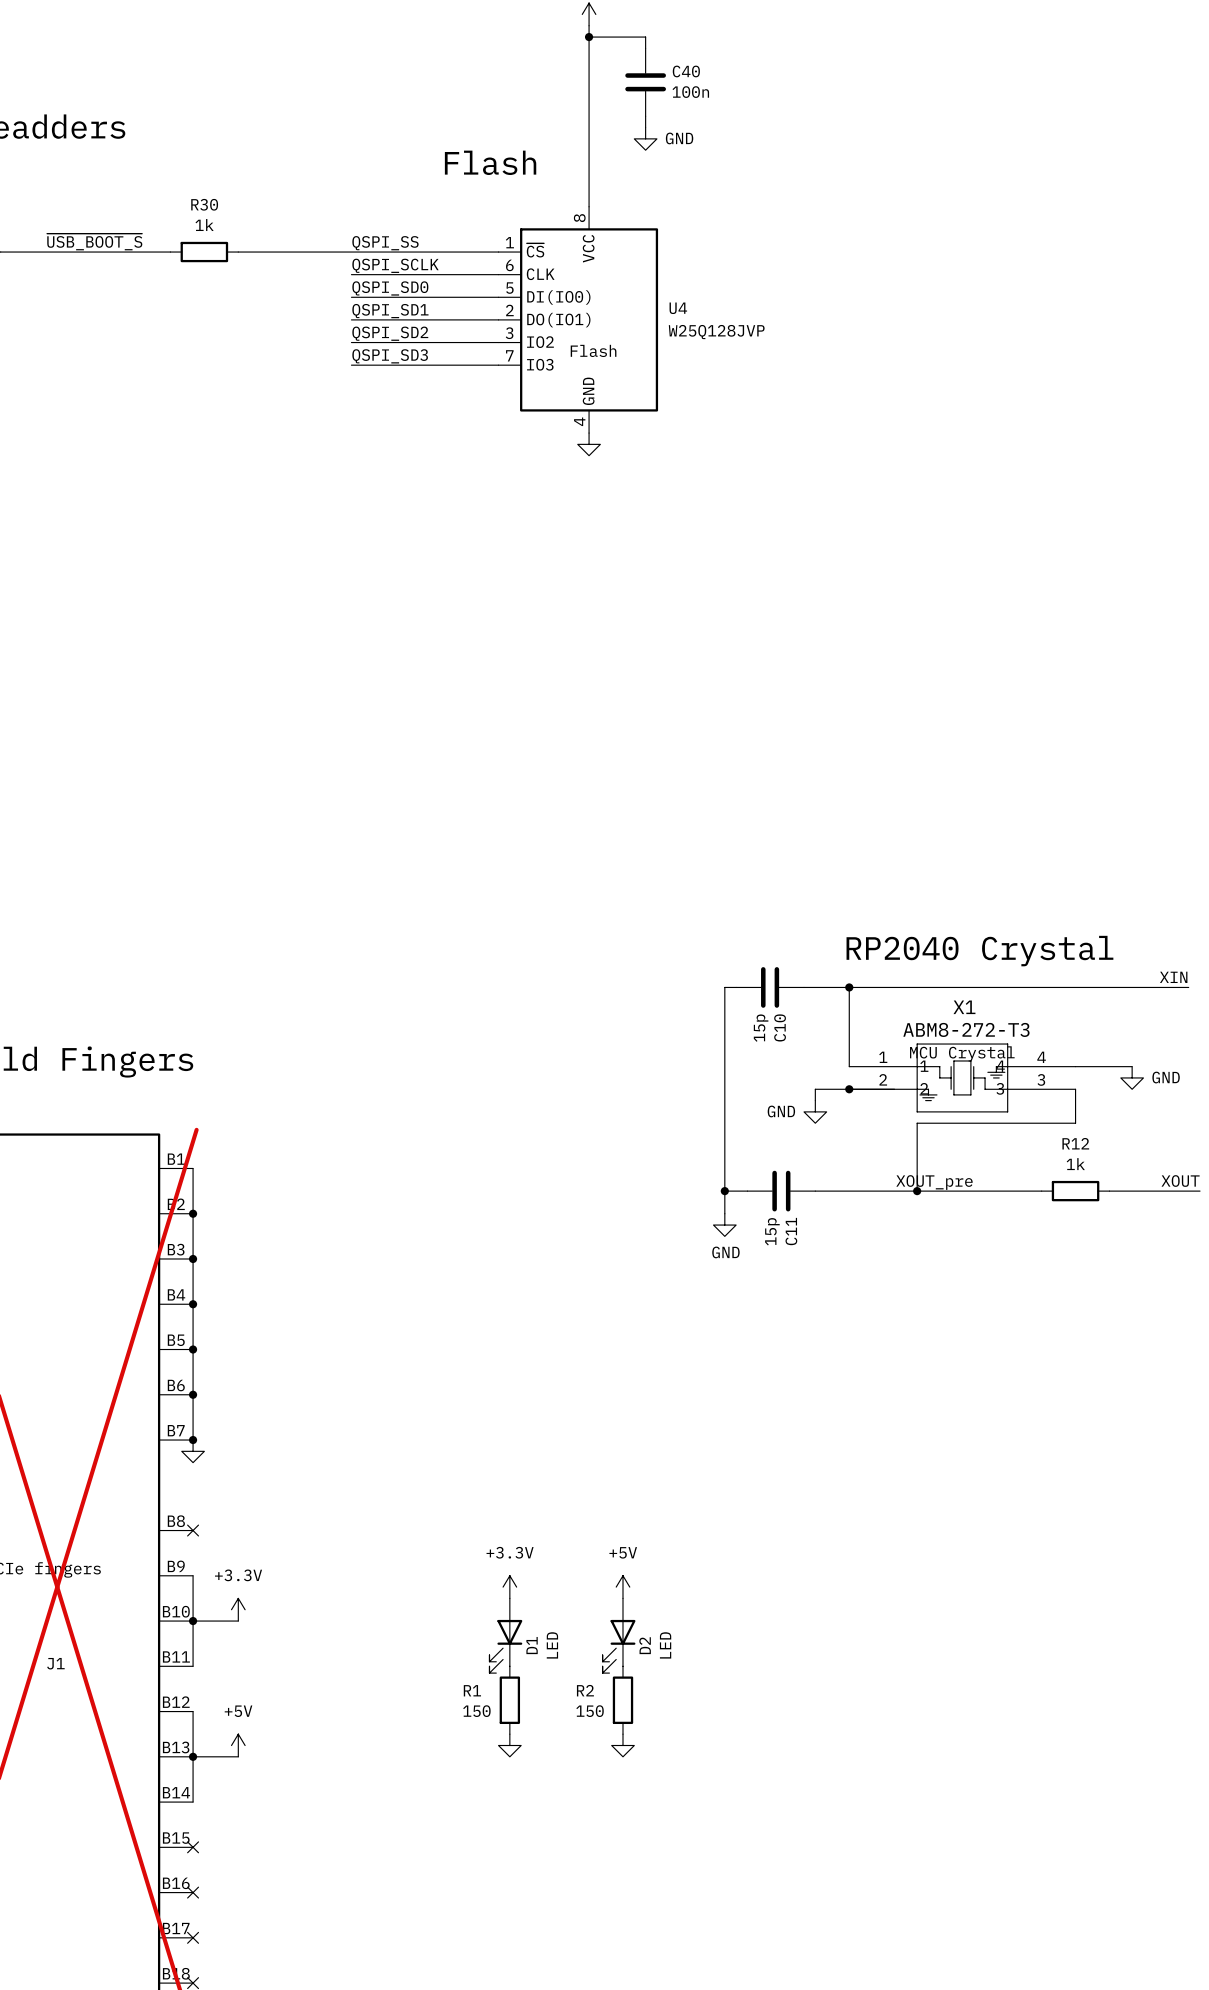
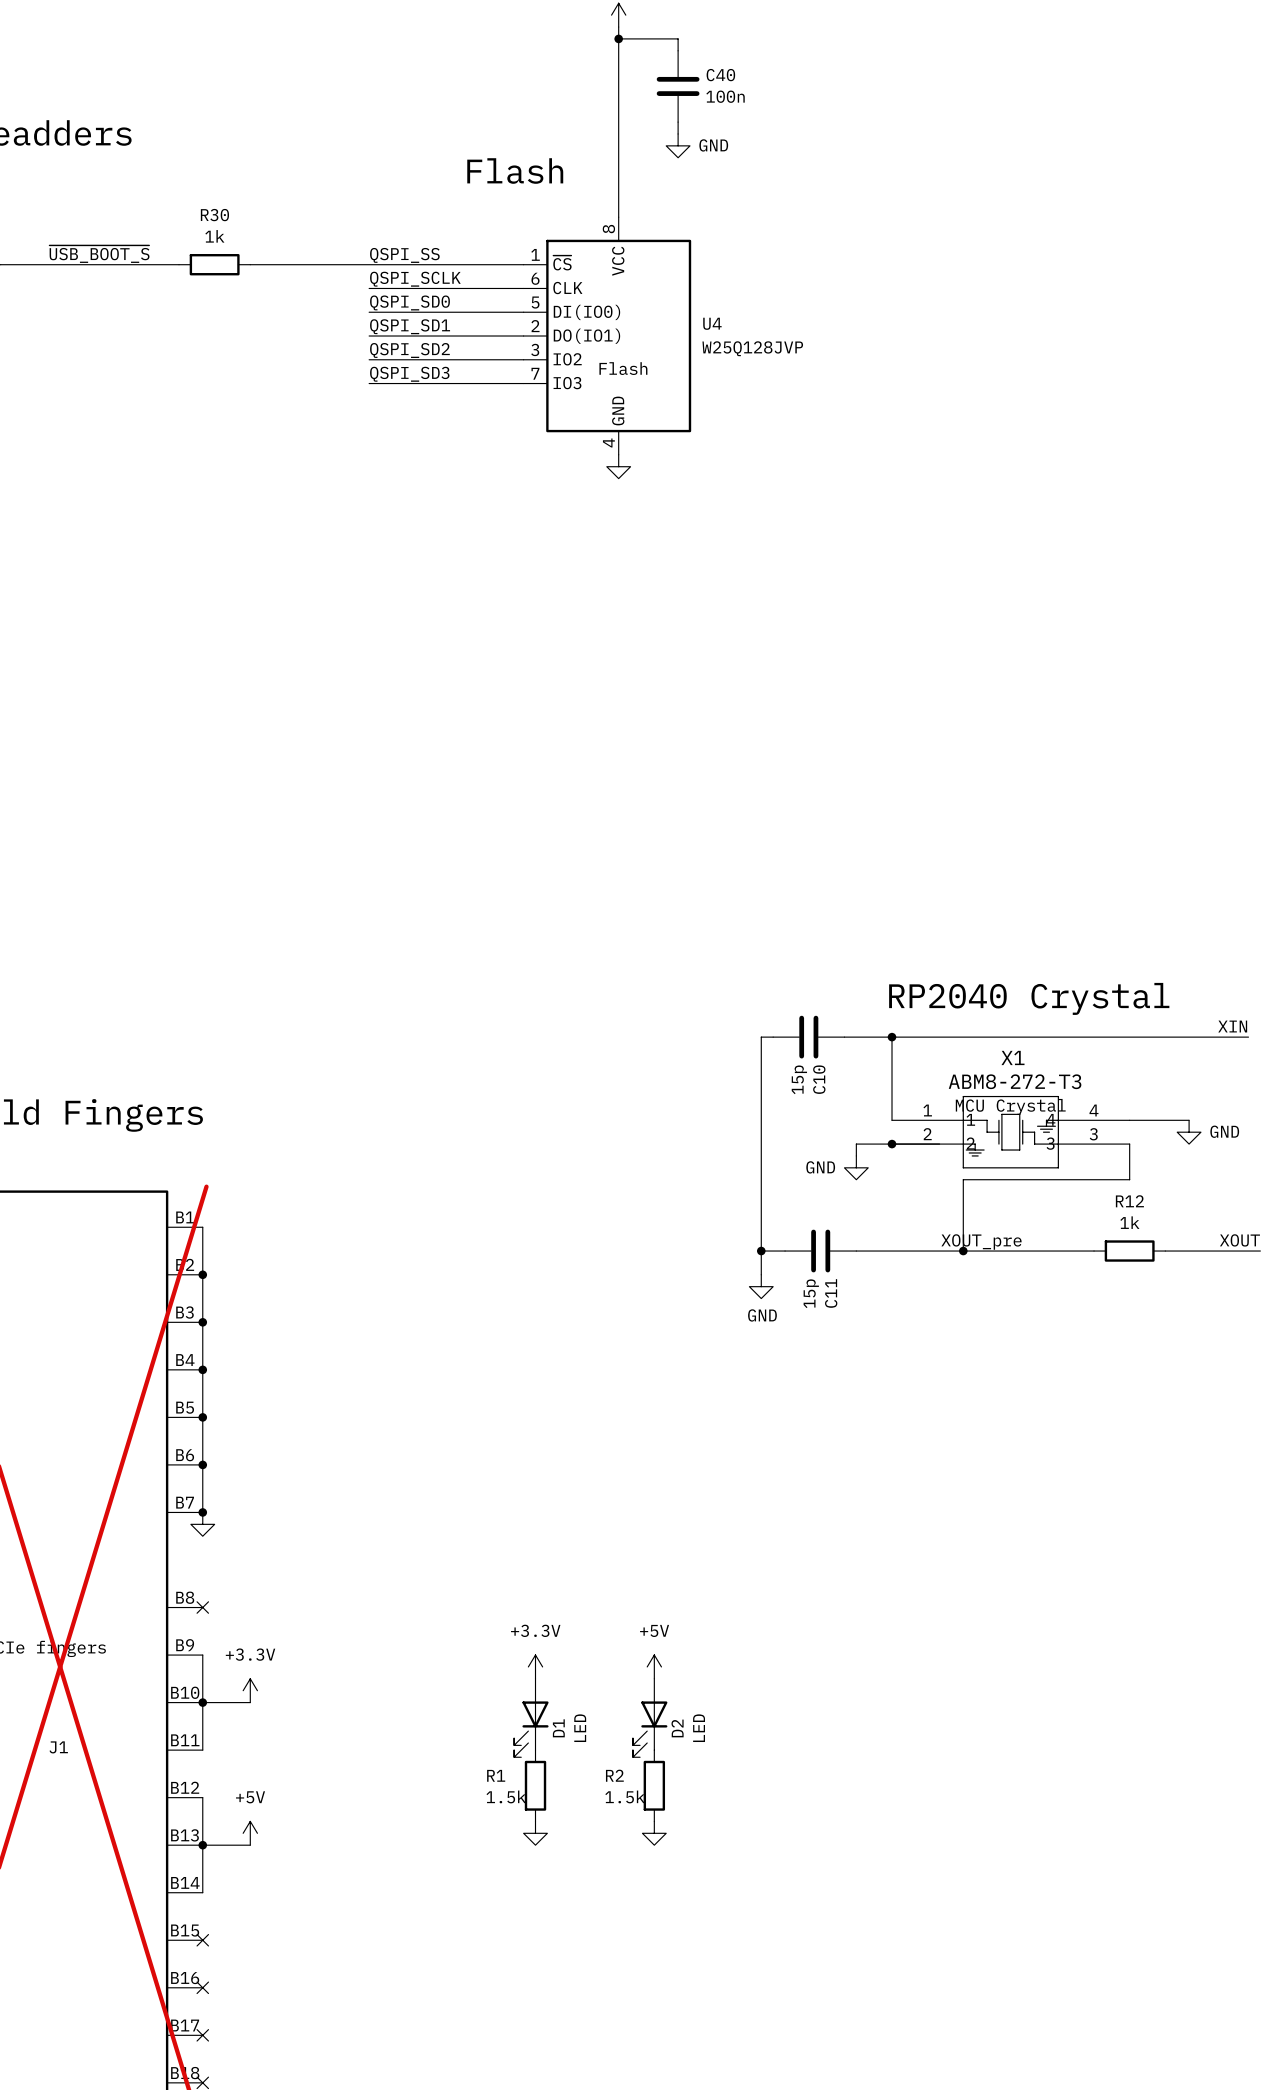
R1 value: 150 (476, 1711) -> 1.5k (506, 1796)
R2 value: 150 (590, 1711) -> 1.5k (625, 1796)

